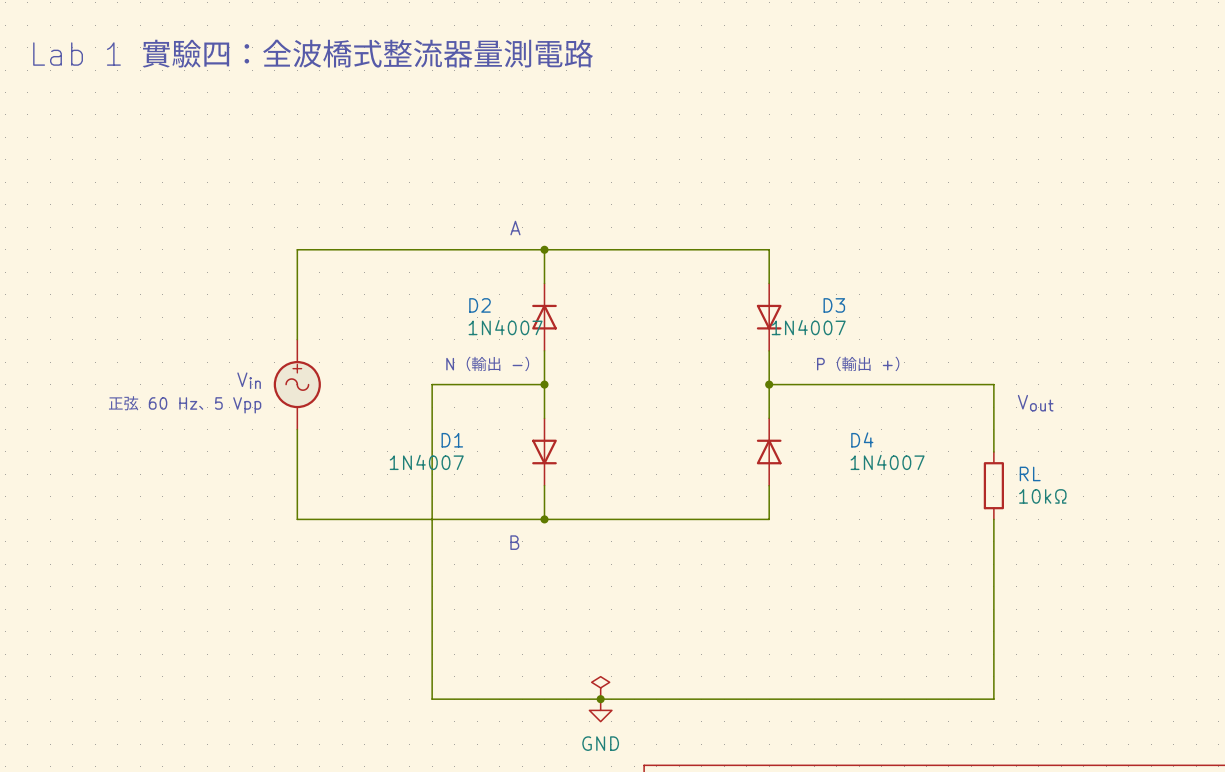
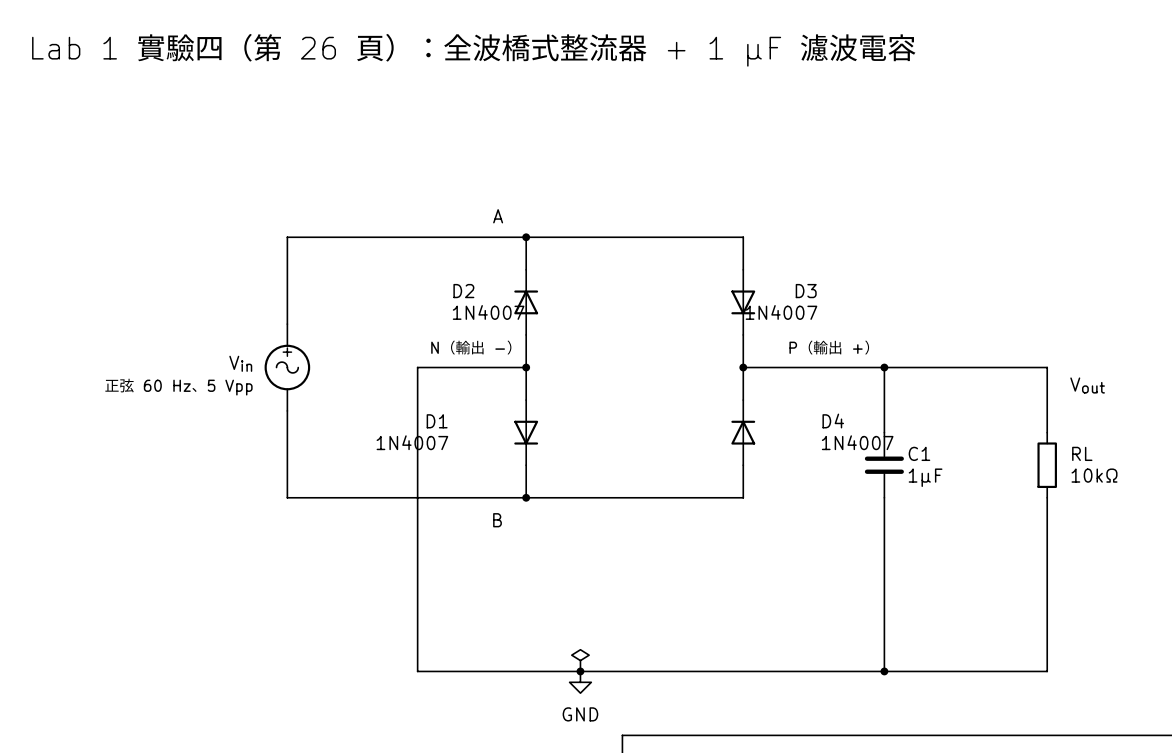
text: Lab 1 實驗四：全波橋式整流器量測電路 (313, 53) -> Lab 1 實驗四（第 26 頁）：全波橋式整流器 + 1 µF 濾波電容 (474, 49)
wire: none -> (884, 367) (884, 432)
junction: none -> (884, 367)
wire: (993, 384) (993, 451) -> (960, 367) (1047, 367) (1047, 432)
text position: Vout (1035, 403) -> Vout (1087, 385)
C1: none -> 1µF (884, 465)
RL position: (993, 485) -> (1047, 465)
wire: none -> (884, 497) (884, 671)
wire: (993, 519) (993, 699) -> (1047, 497) (1047, 671) (960, 671)
junction: none -> (884, 671)

